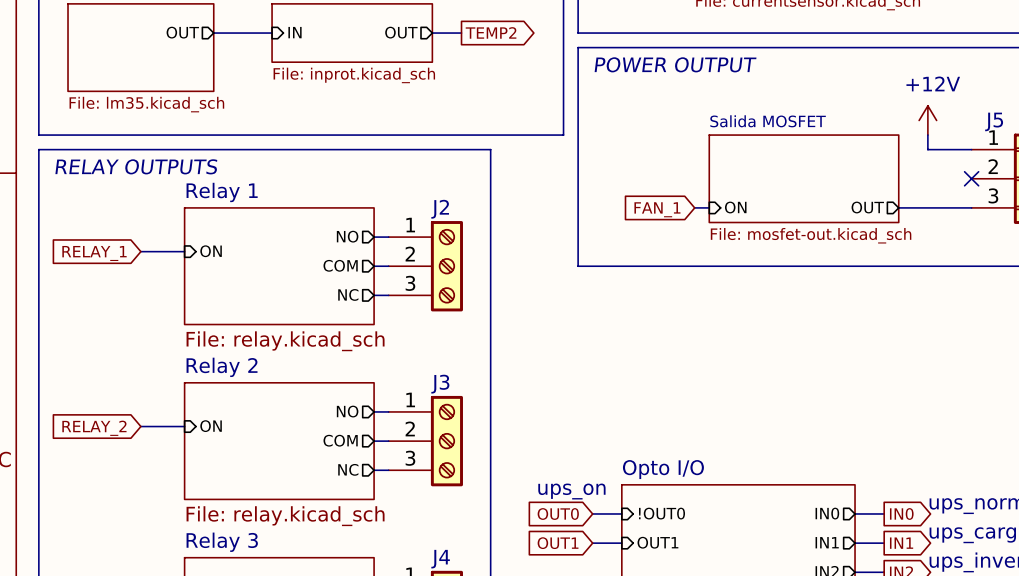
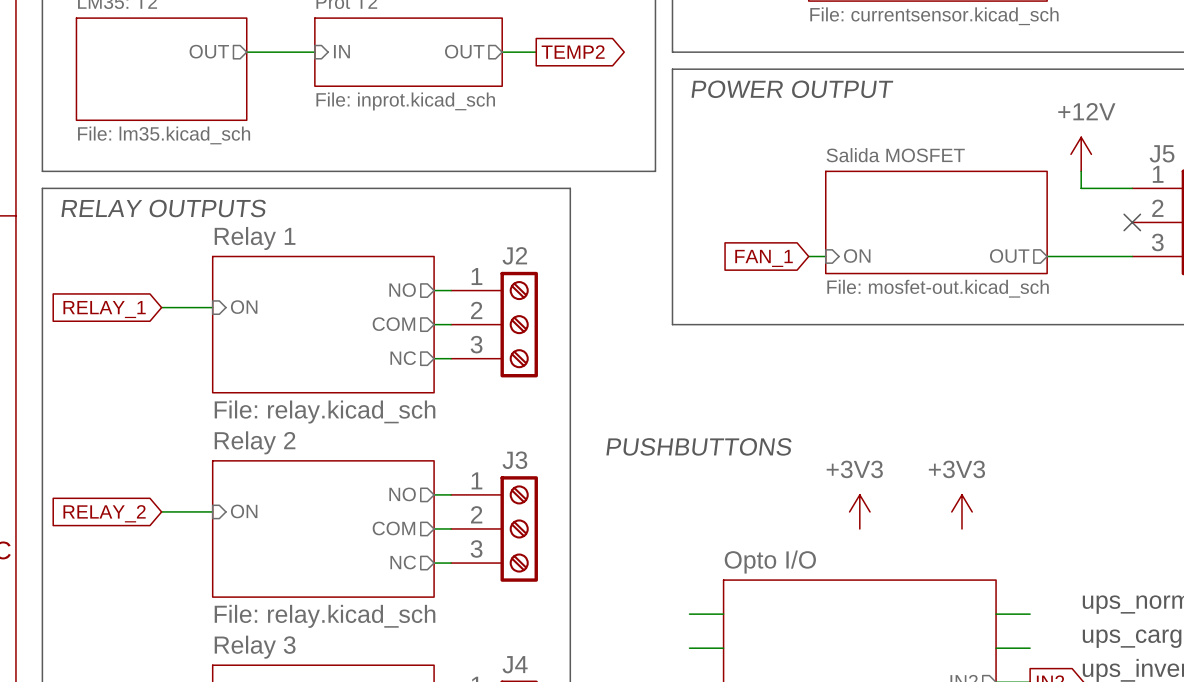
text: none -> PUSHBUTTONS (698, 446)
power symbol: none -> +3V3 (859, 511)
power symbol: none -> +3V3 (961, 511)
text: ups_on (571, 491) -> none
sheet pin: !OUT0 (662, 513) -> none
sheet pin: IN0 (827, 513) -> none
global label: OUT0 (558, 514) -> none
global label: IN0 (901, 514) -> none
sheet pin: OUT1 (657, 542) -> none
sheet pin: IN1 (827, 542) -> none
global label: OUT1 (558, 543) -> none
global label: IN1 (901, 543) -> none

